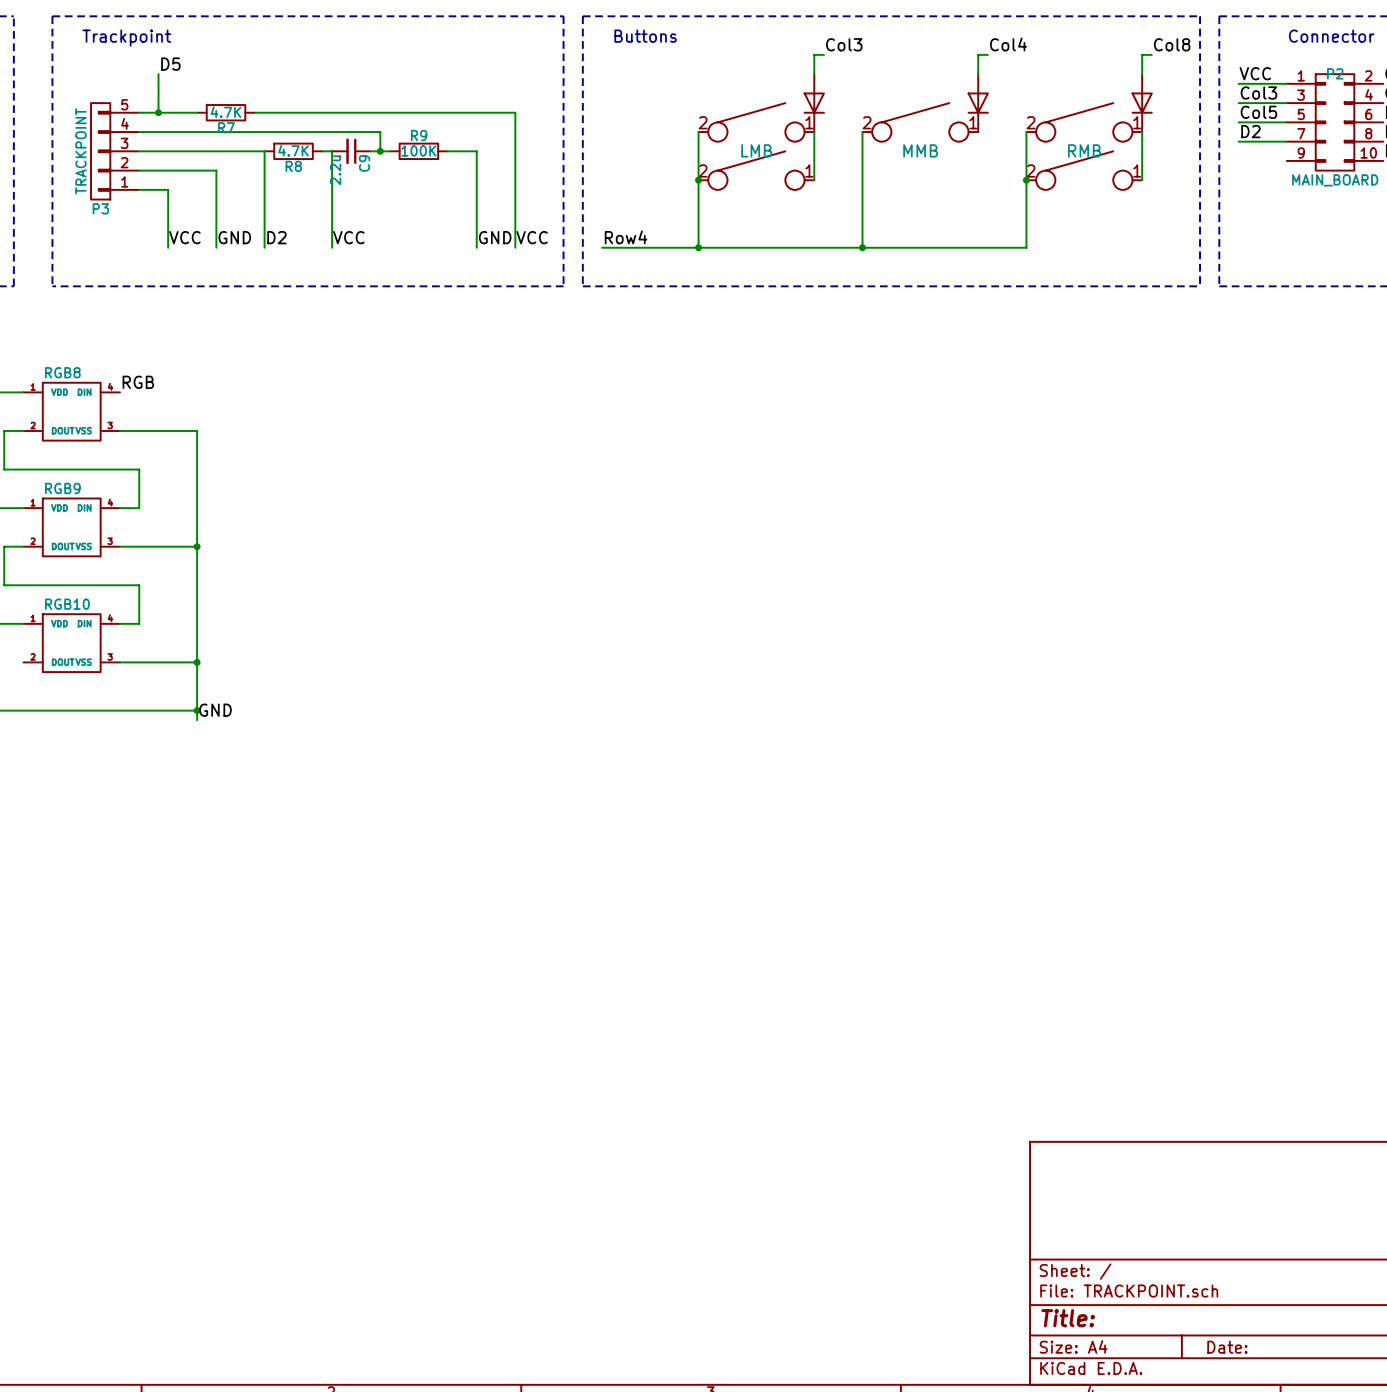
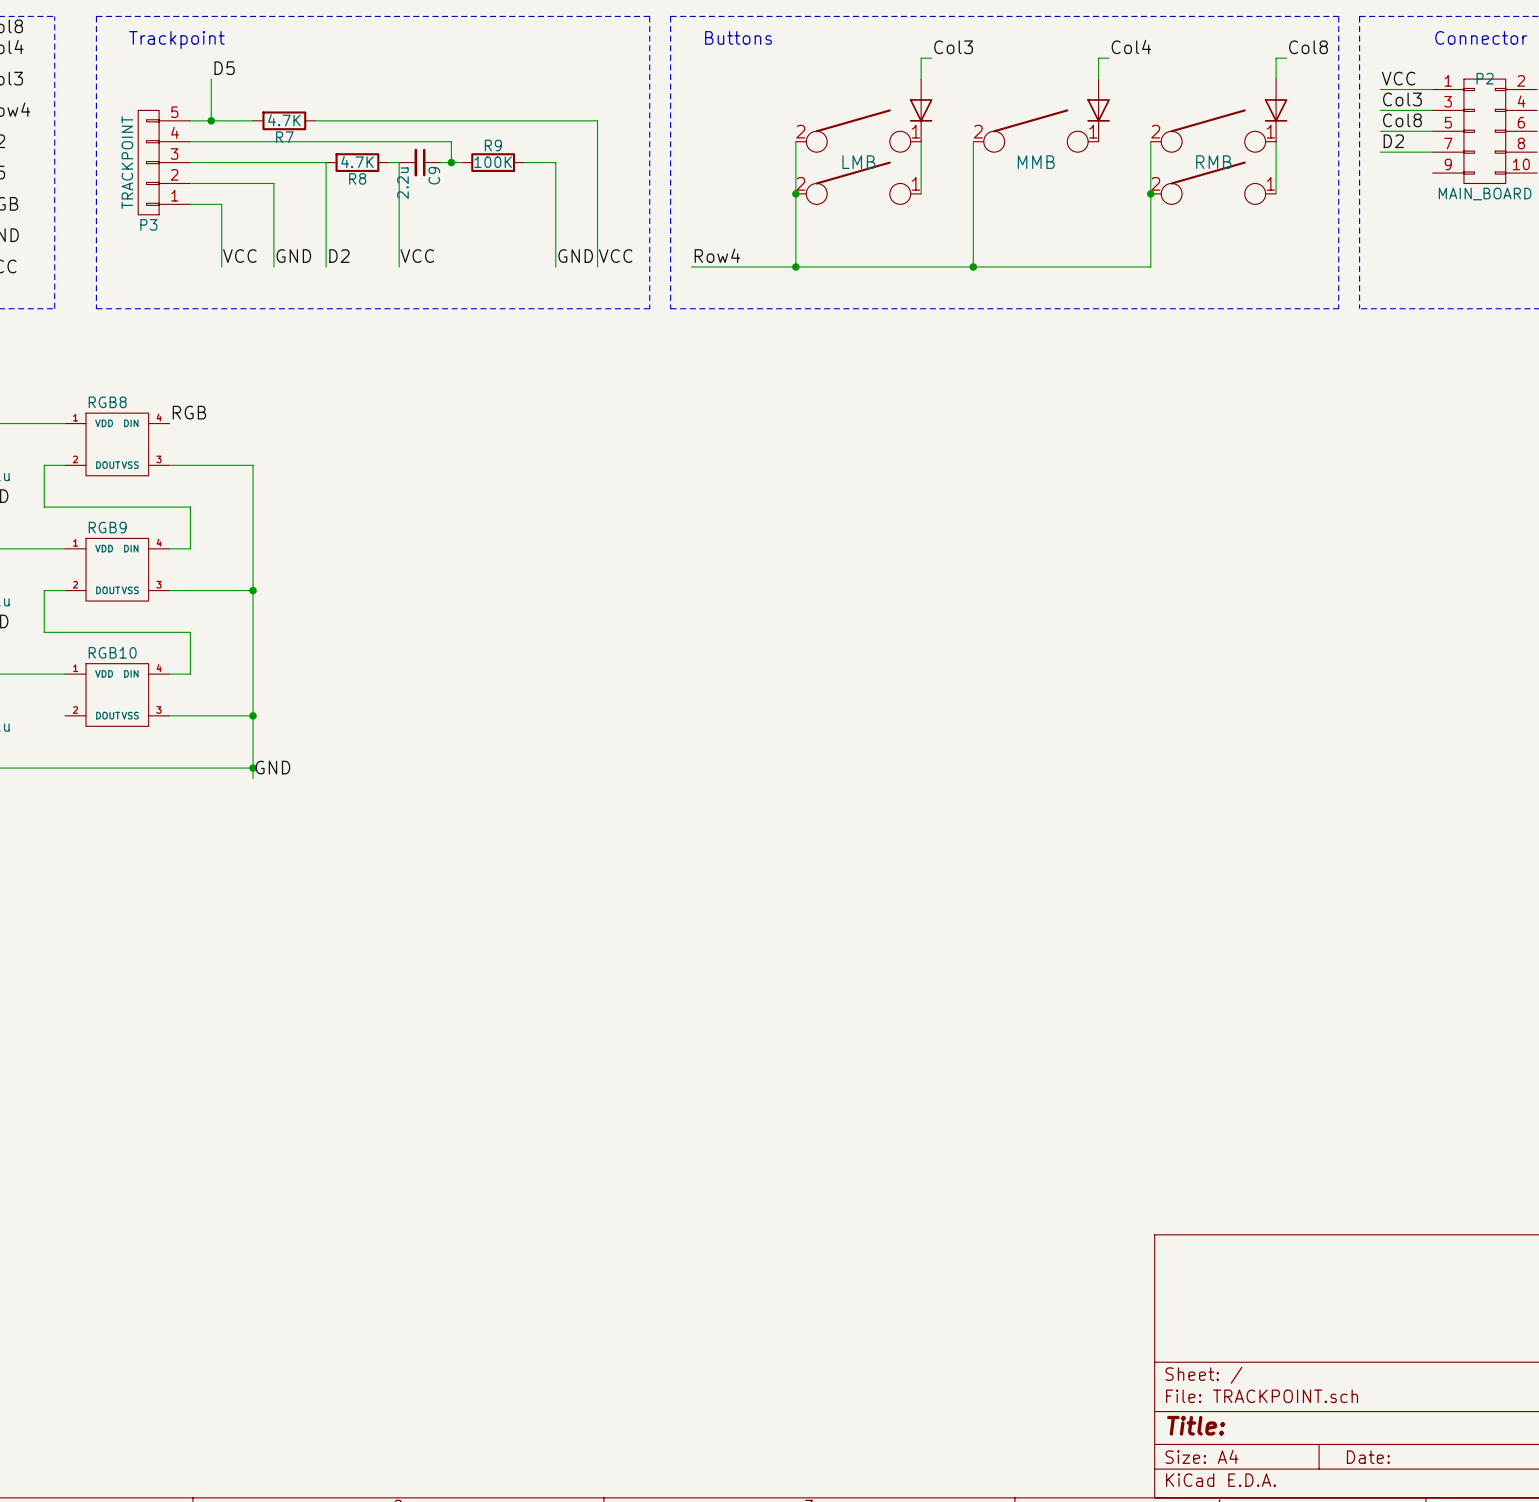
label: Col5 (1258, 112) -> Col8 (1402, 120)

